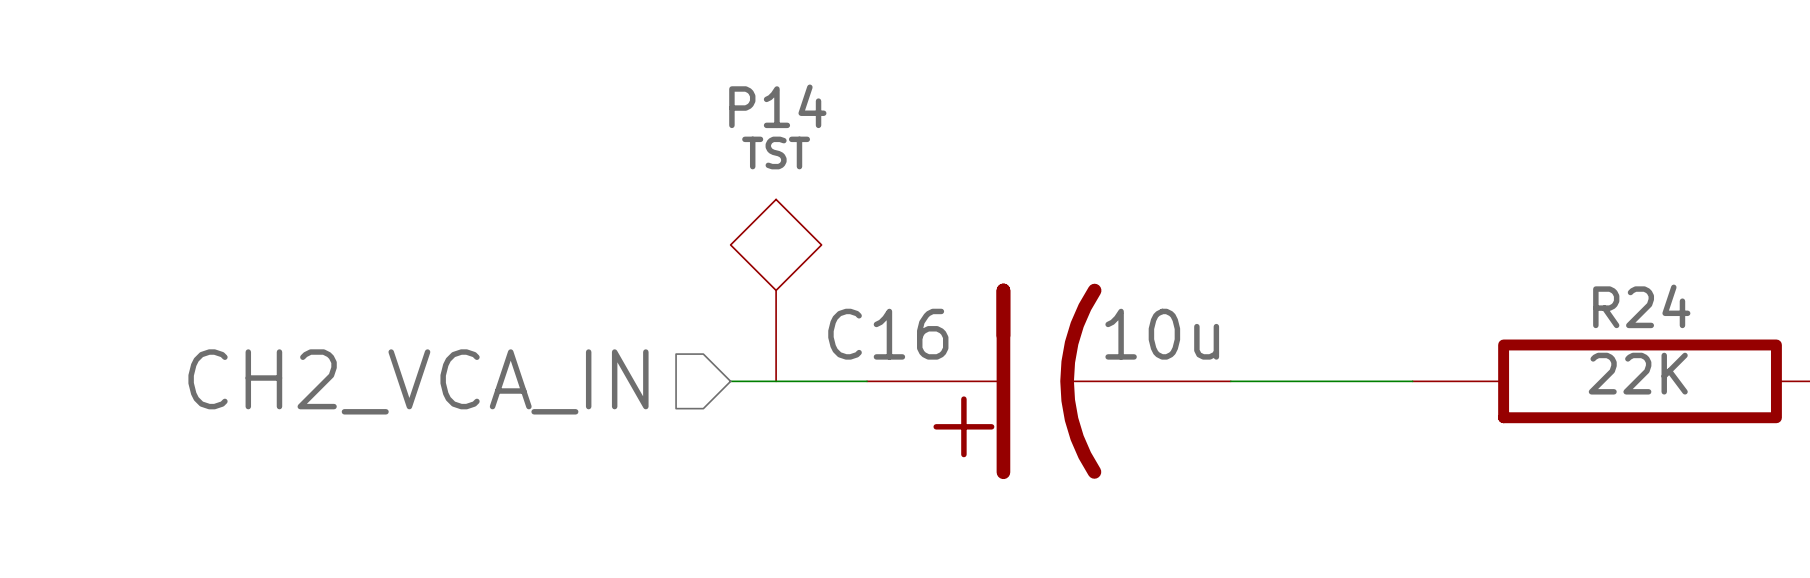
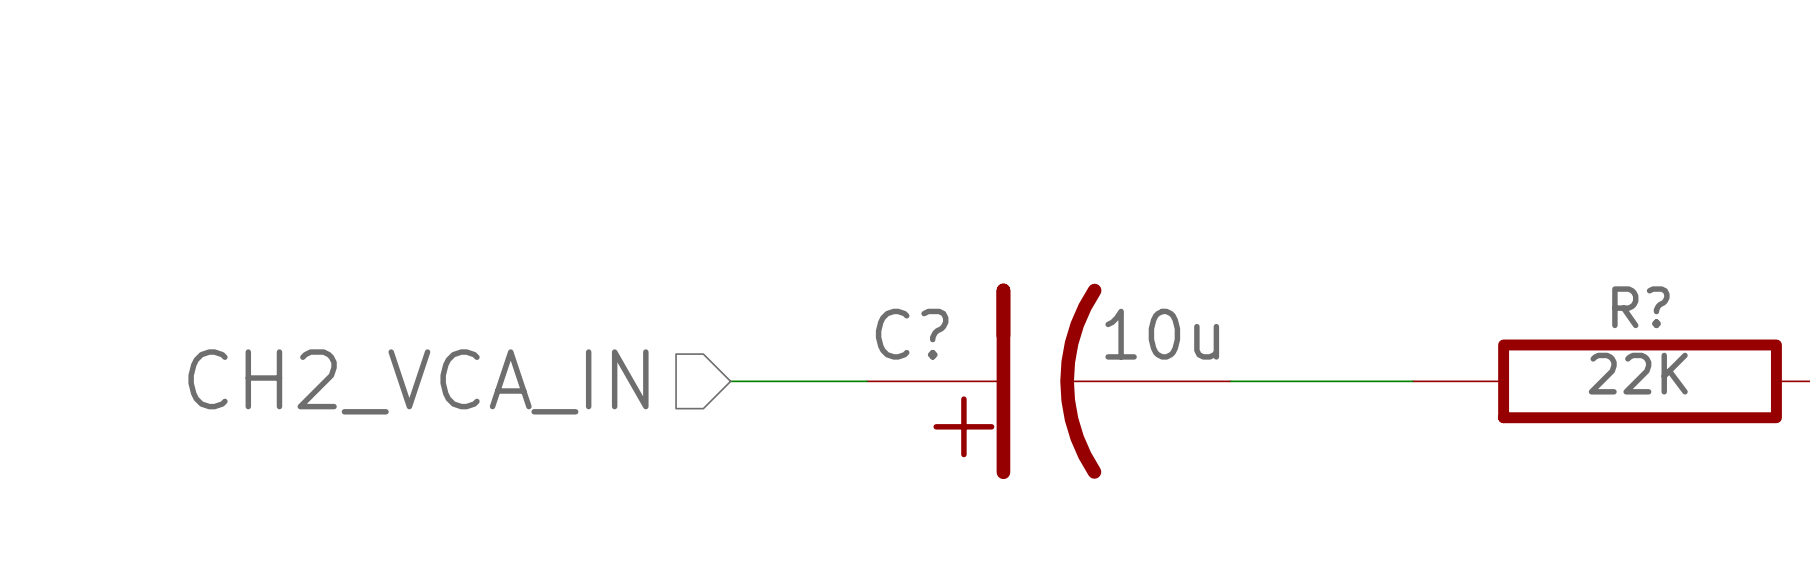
P14: TST (776, 290) -> none
R24 name: R24 (1641, 306) -> R? (1640, 307)
C16 name: C16 (888, 334) -> C? (912, 334)

